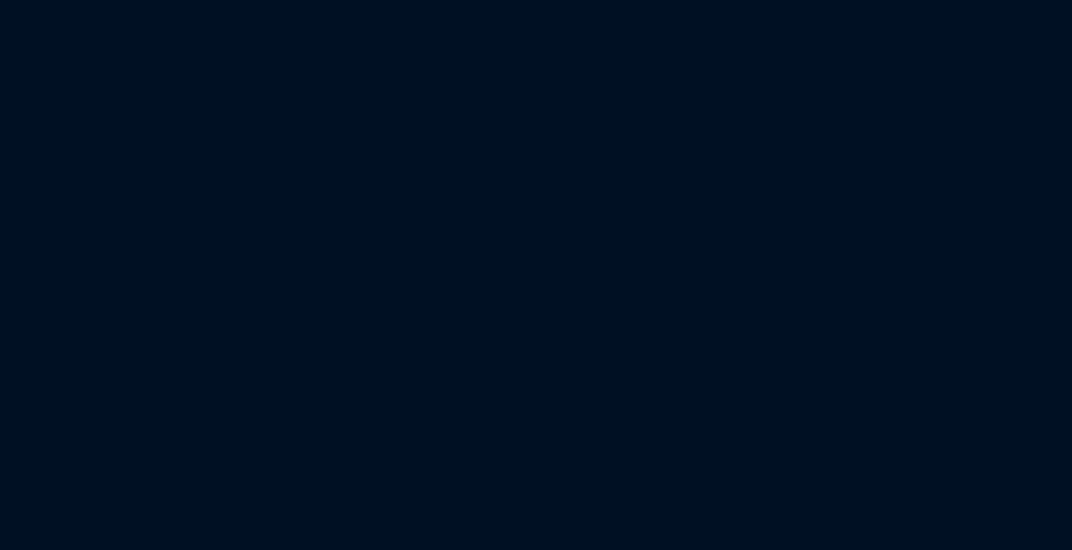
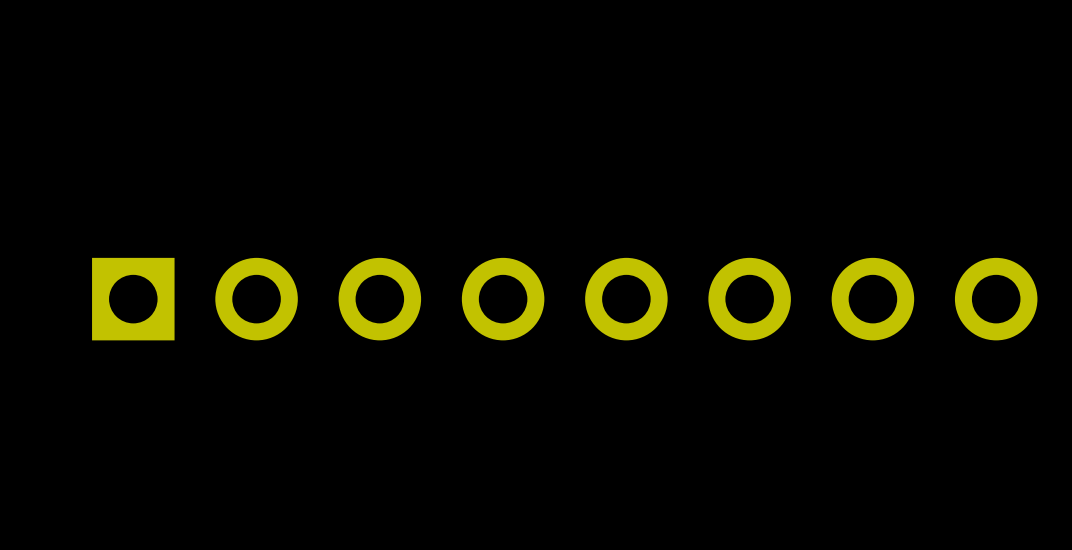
part: none -> (564, 299)

